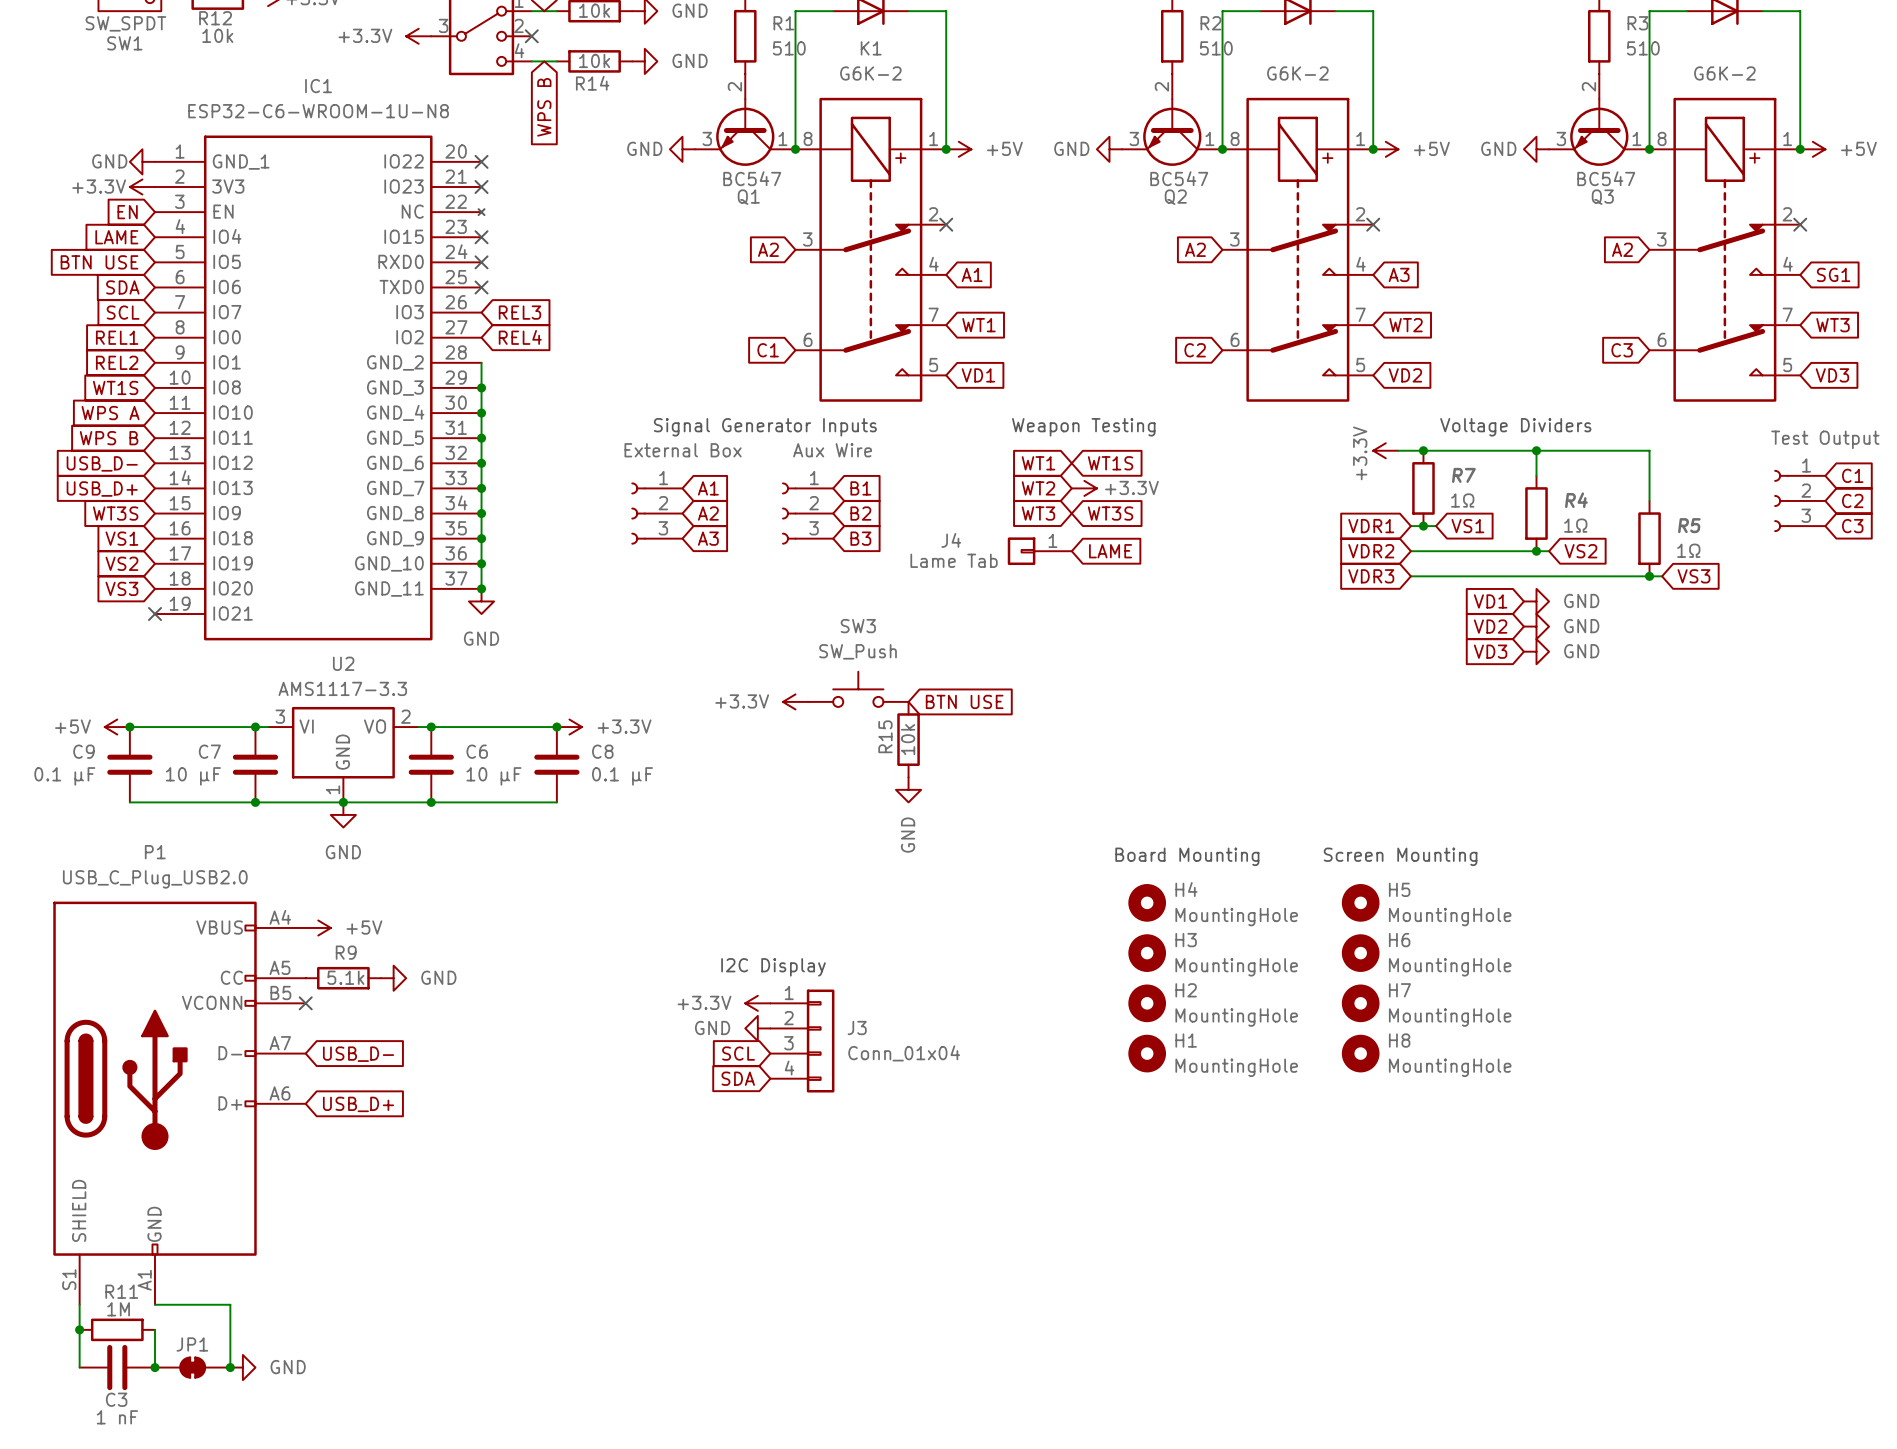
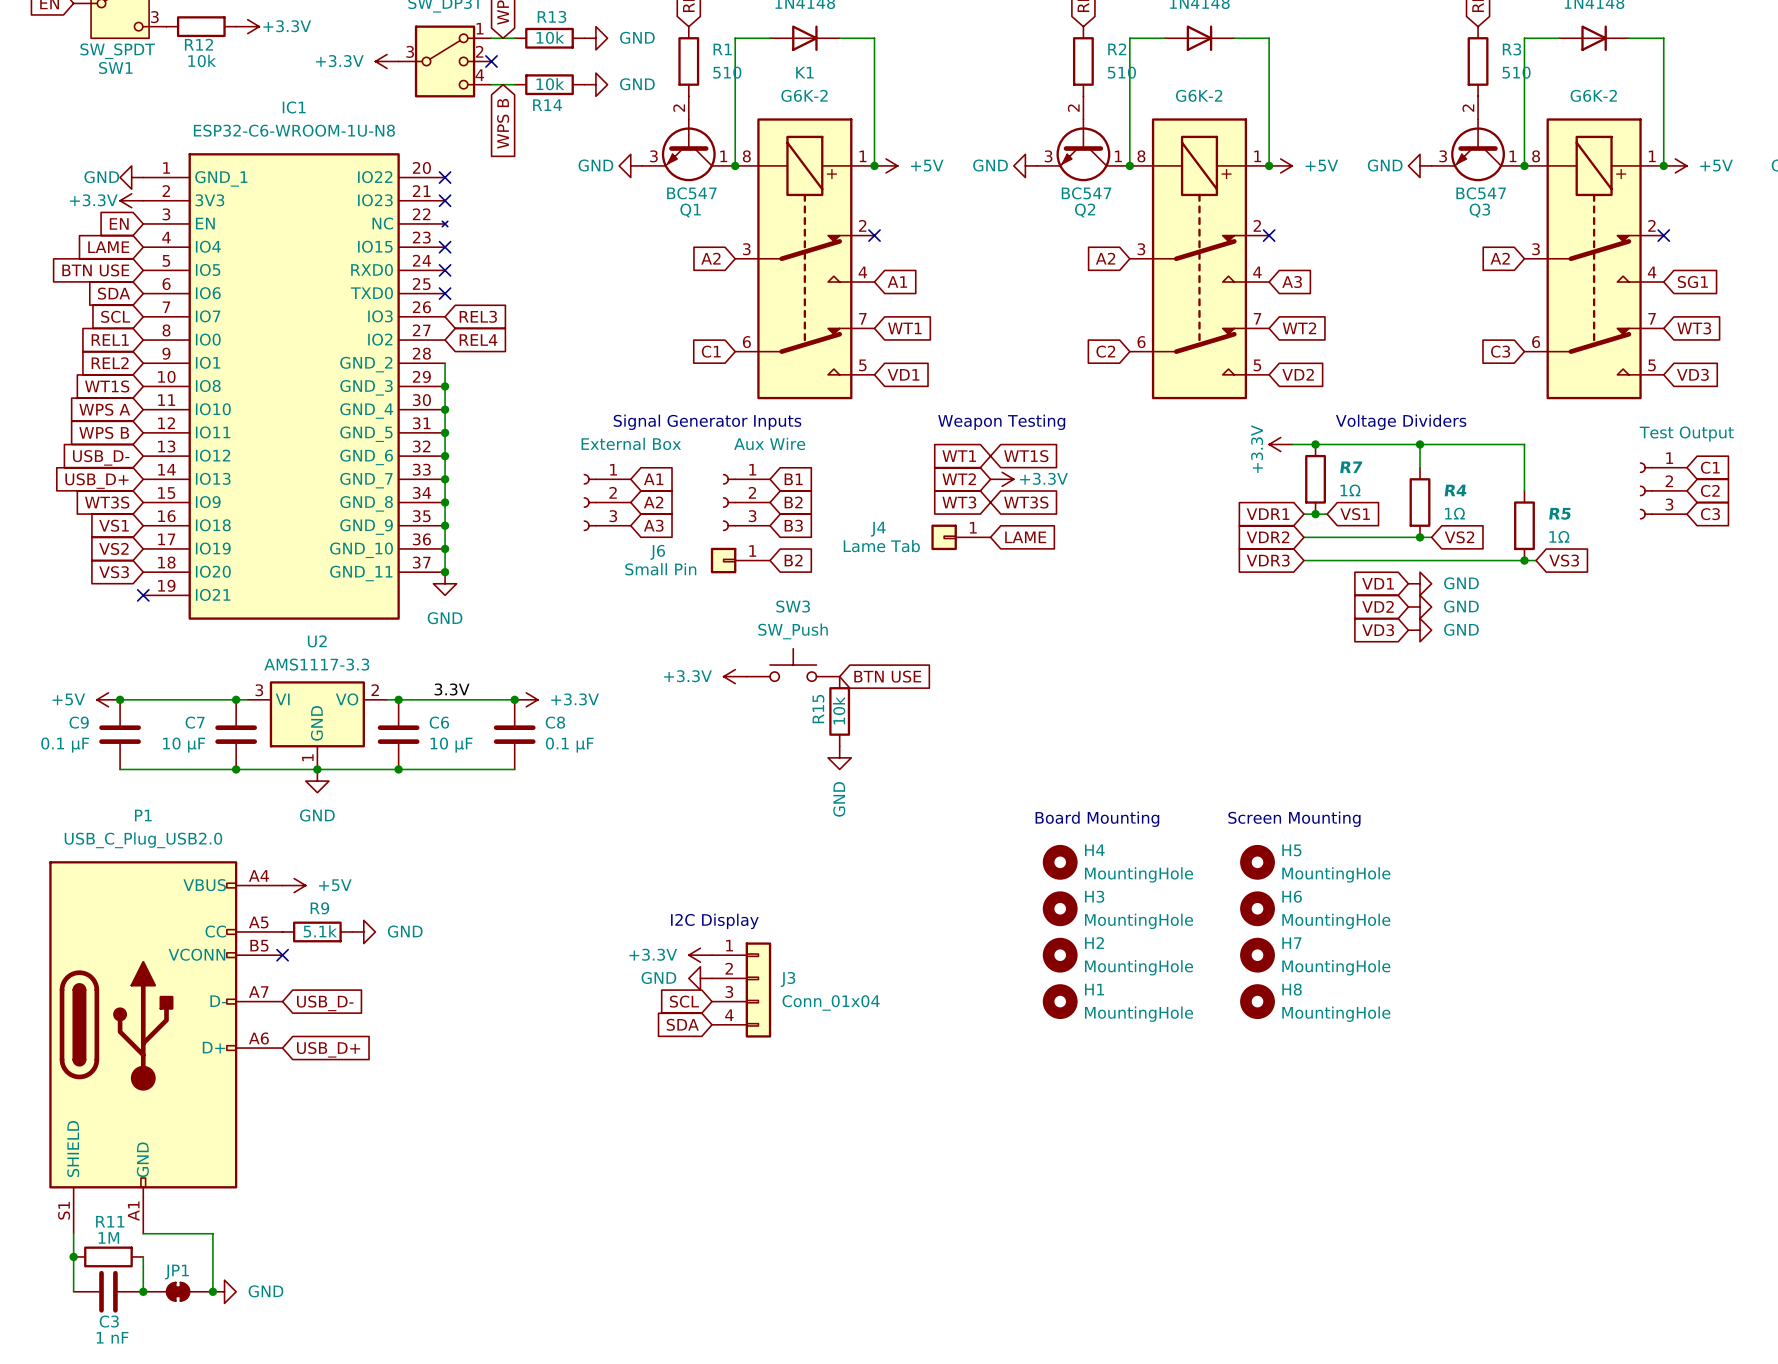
J6: none -> Small Pin (740, 560)
global label: none -> B2 (793, 560)
label: none -> 3.3V (452, 689)

